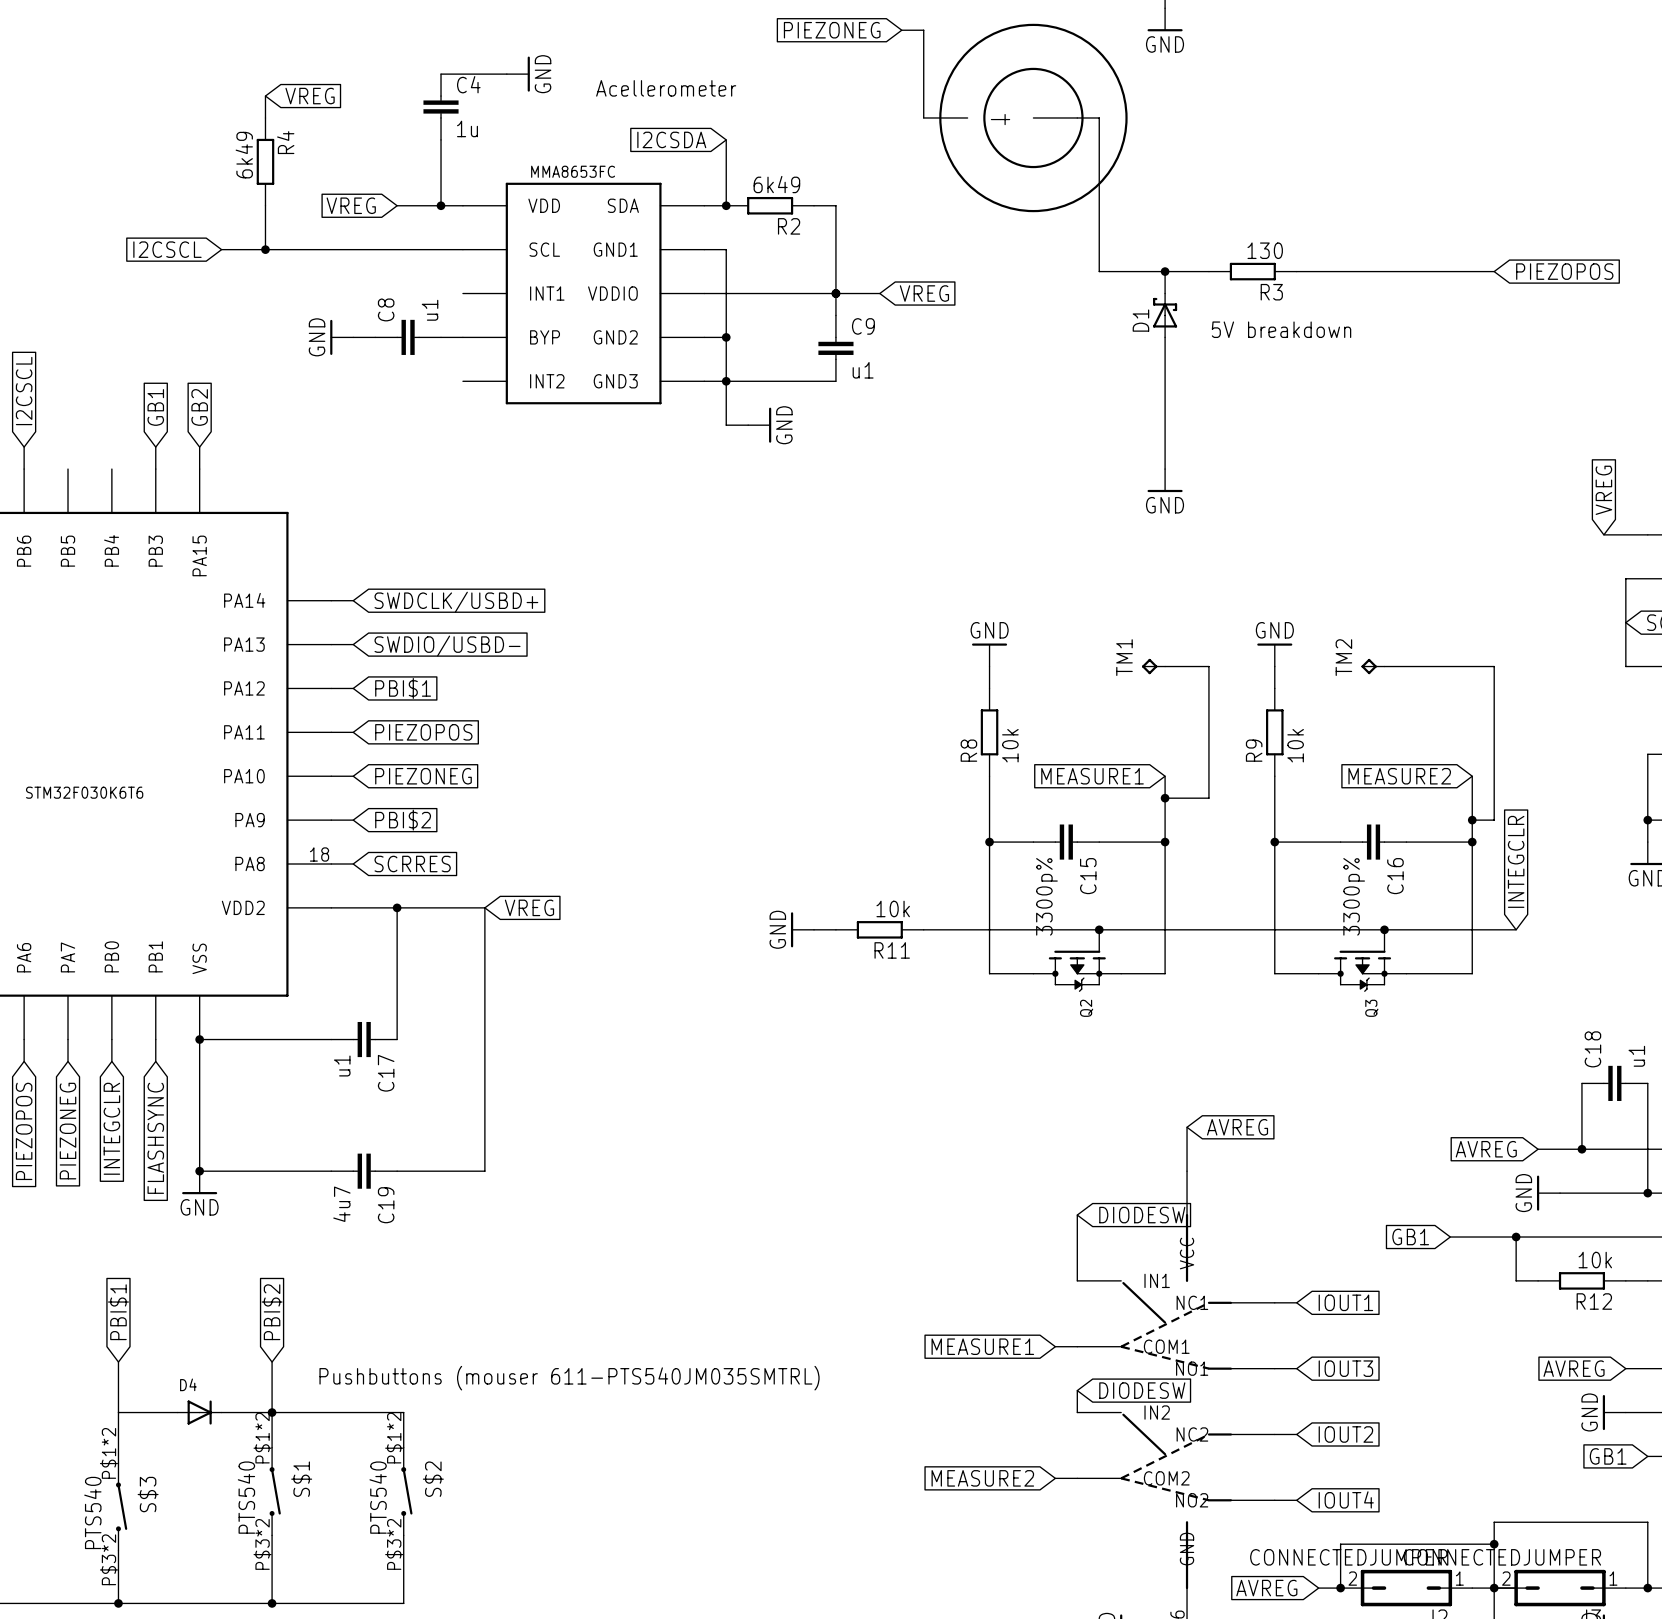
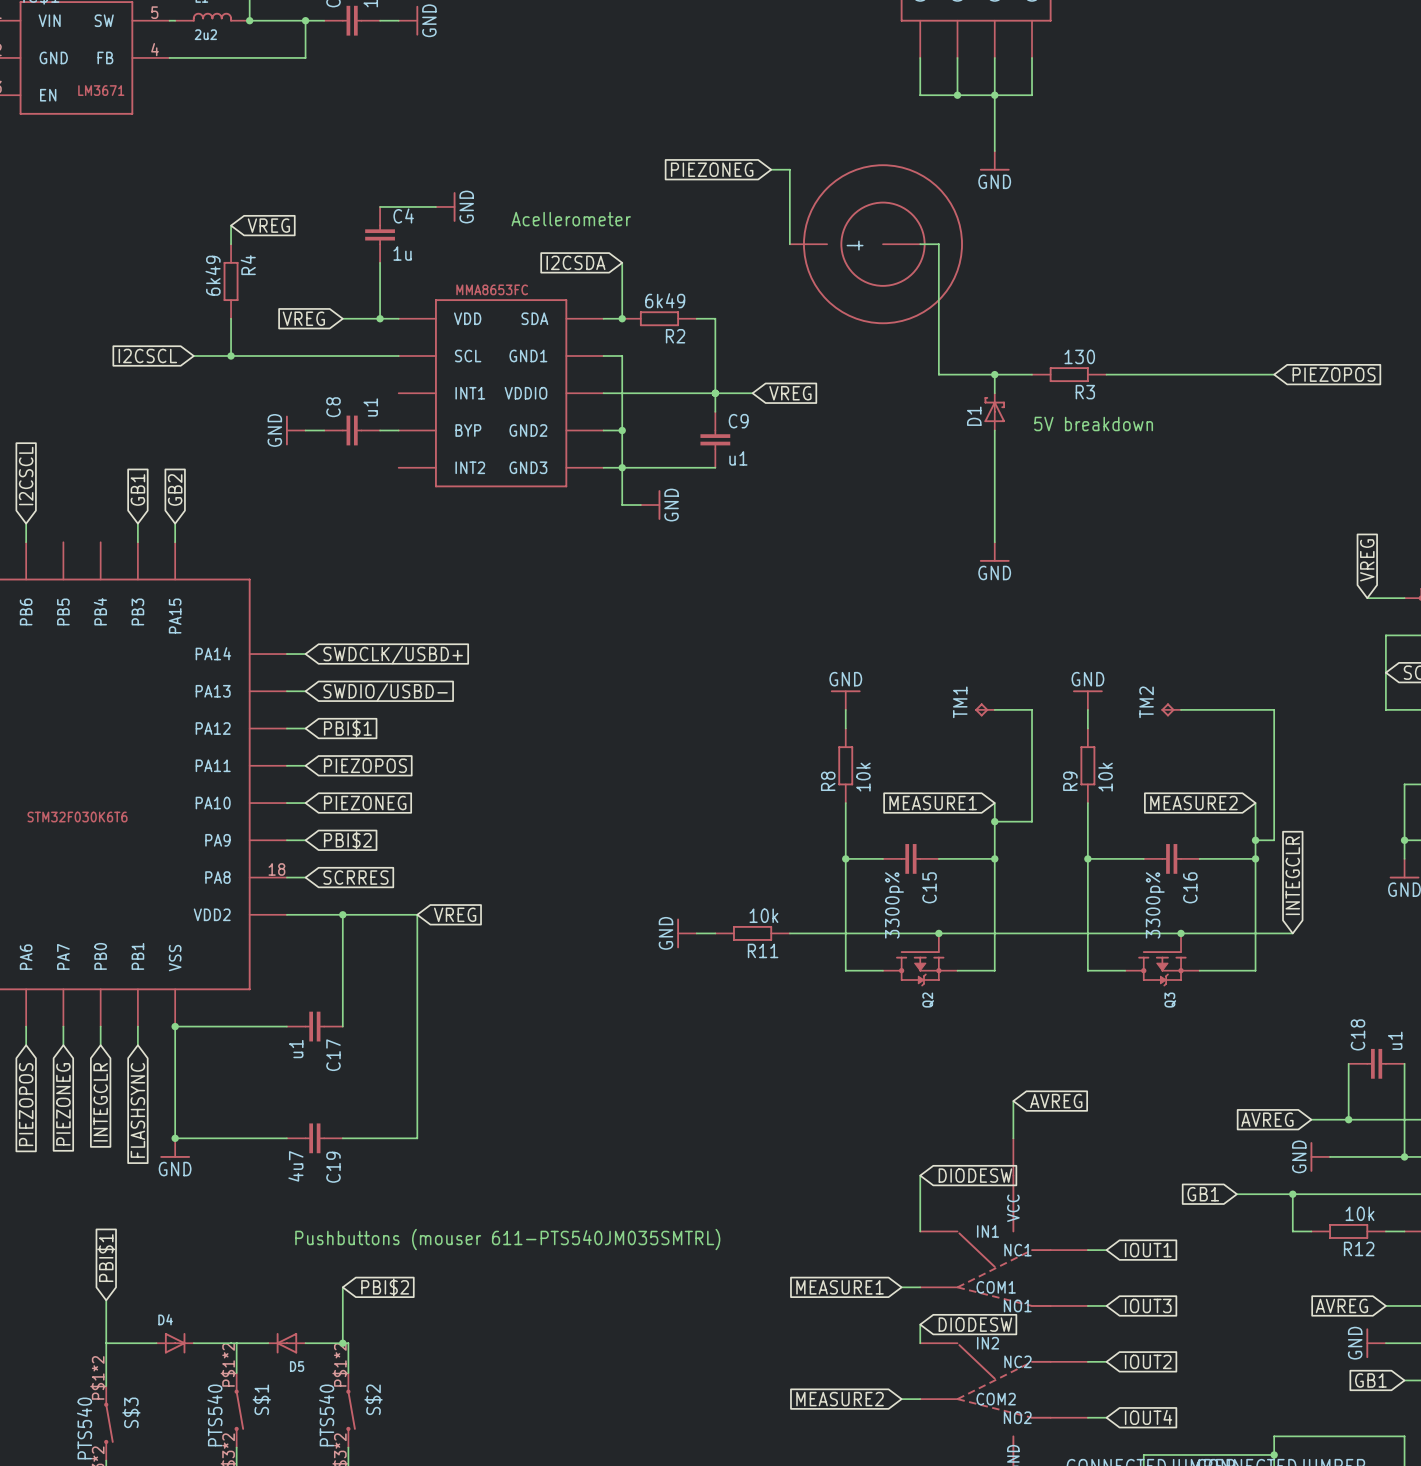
global label rotation: 0° (272, 1312) -> 90° clockwise (385, 1287)
global label position: PBI$2 (272, 1312) -> PBI$2 (385, 1287)
wire: none -> (342, 1287) (342, 1343)
wire: (272, 1362) (272, 1412) -> none
text position: Pushbuttons (mouser 611-PTS540JM035SMTRL) (569, 1378) -> Pushbuttons (mouser 611-PTS540JM035SMTRL) (507, 1239)
junction: (272, 1412) -> none
D5: none -> (286, 1343)
junction: none -> (342, 1343)

